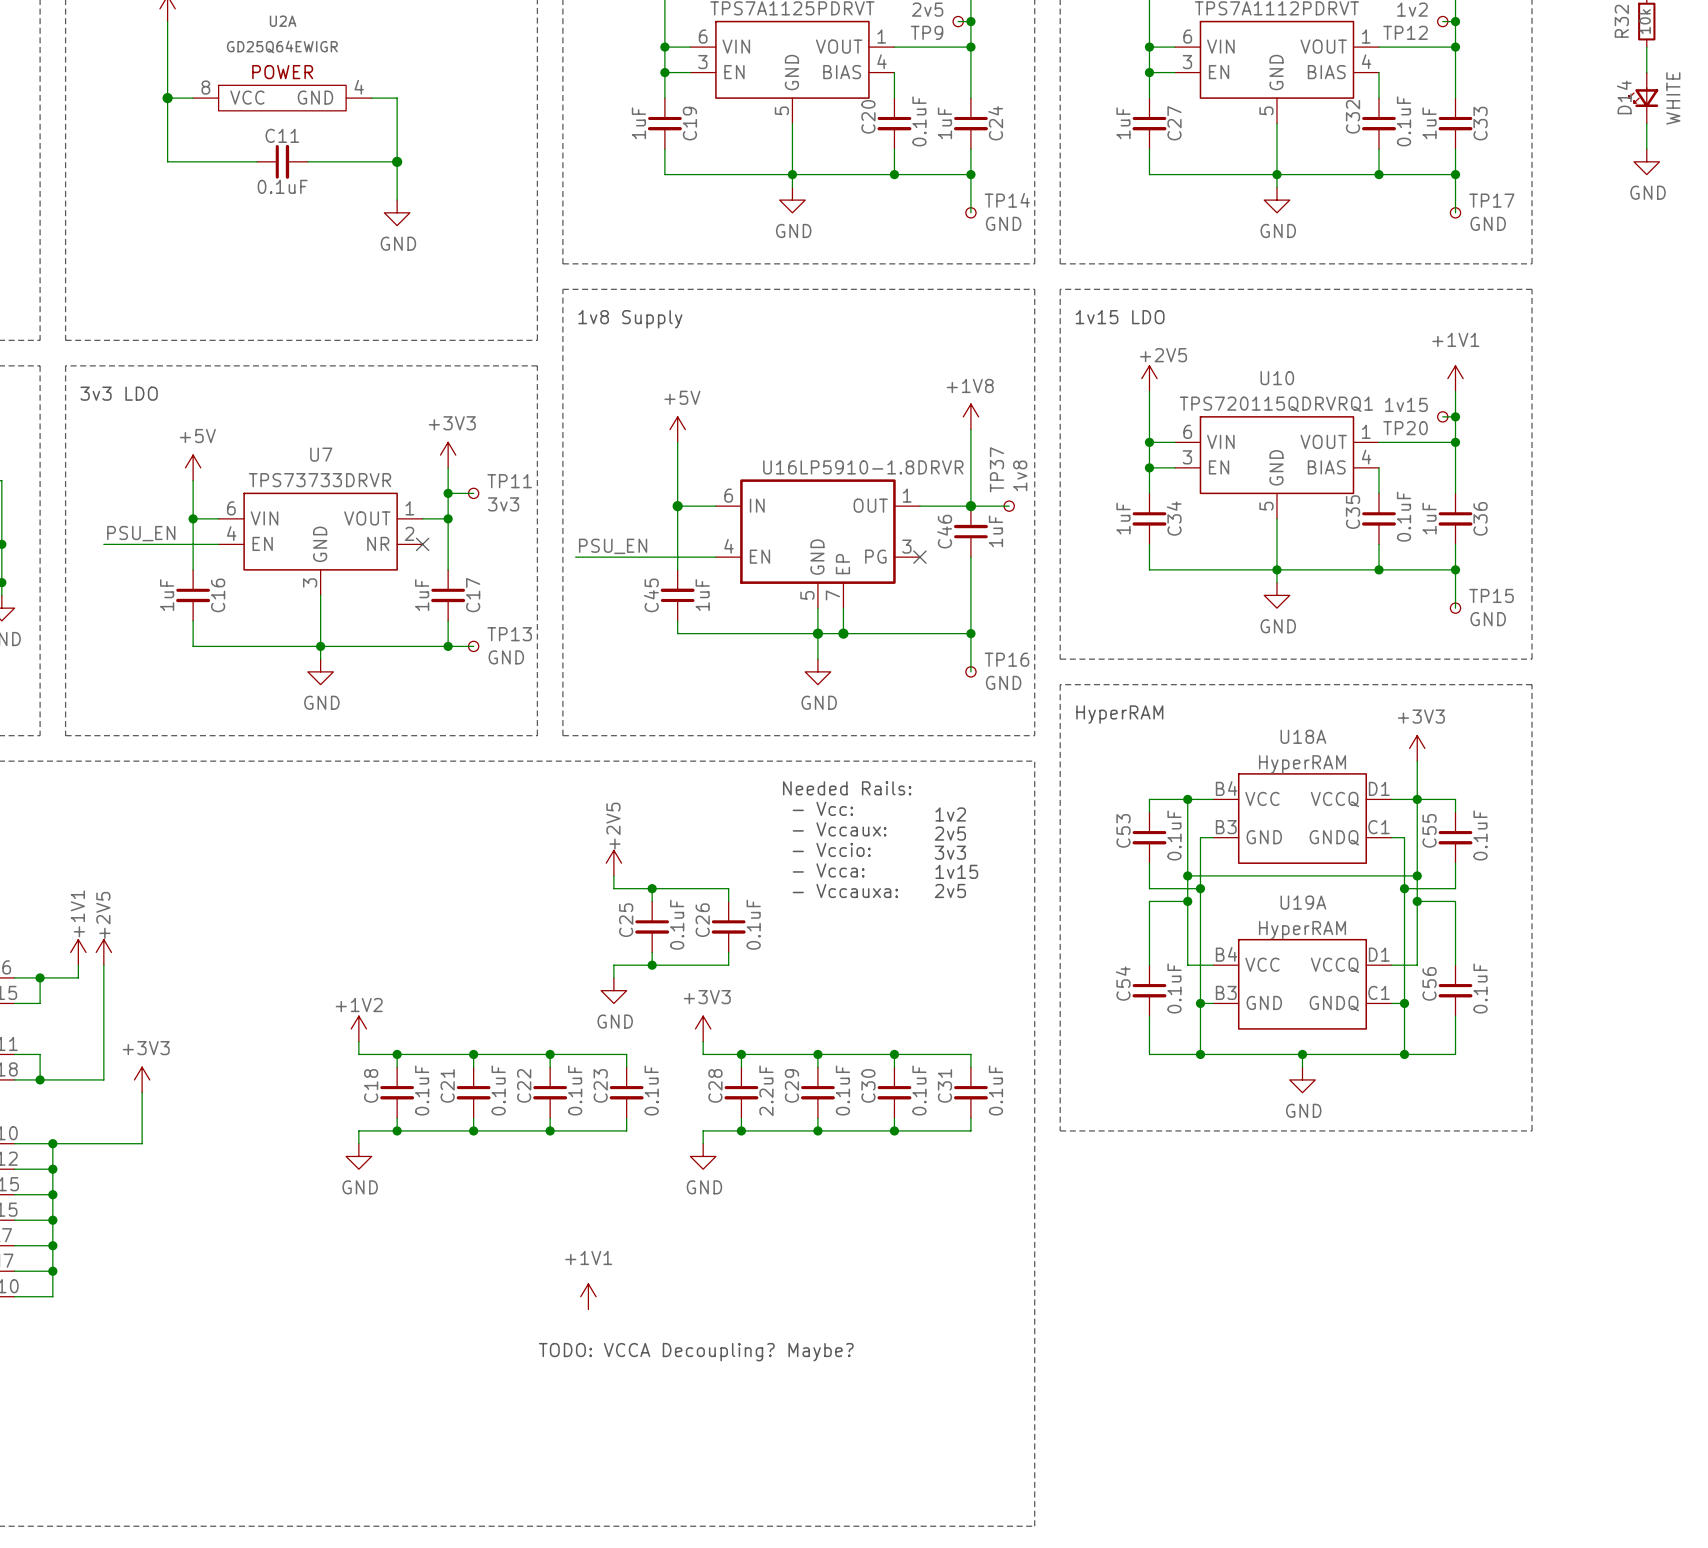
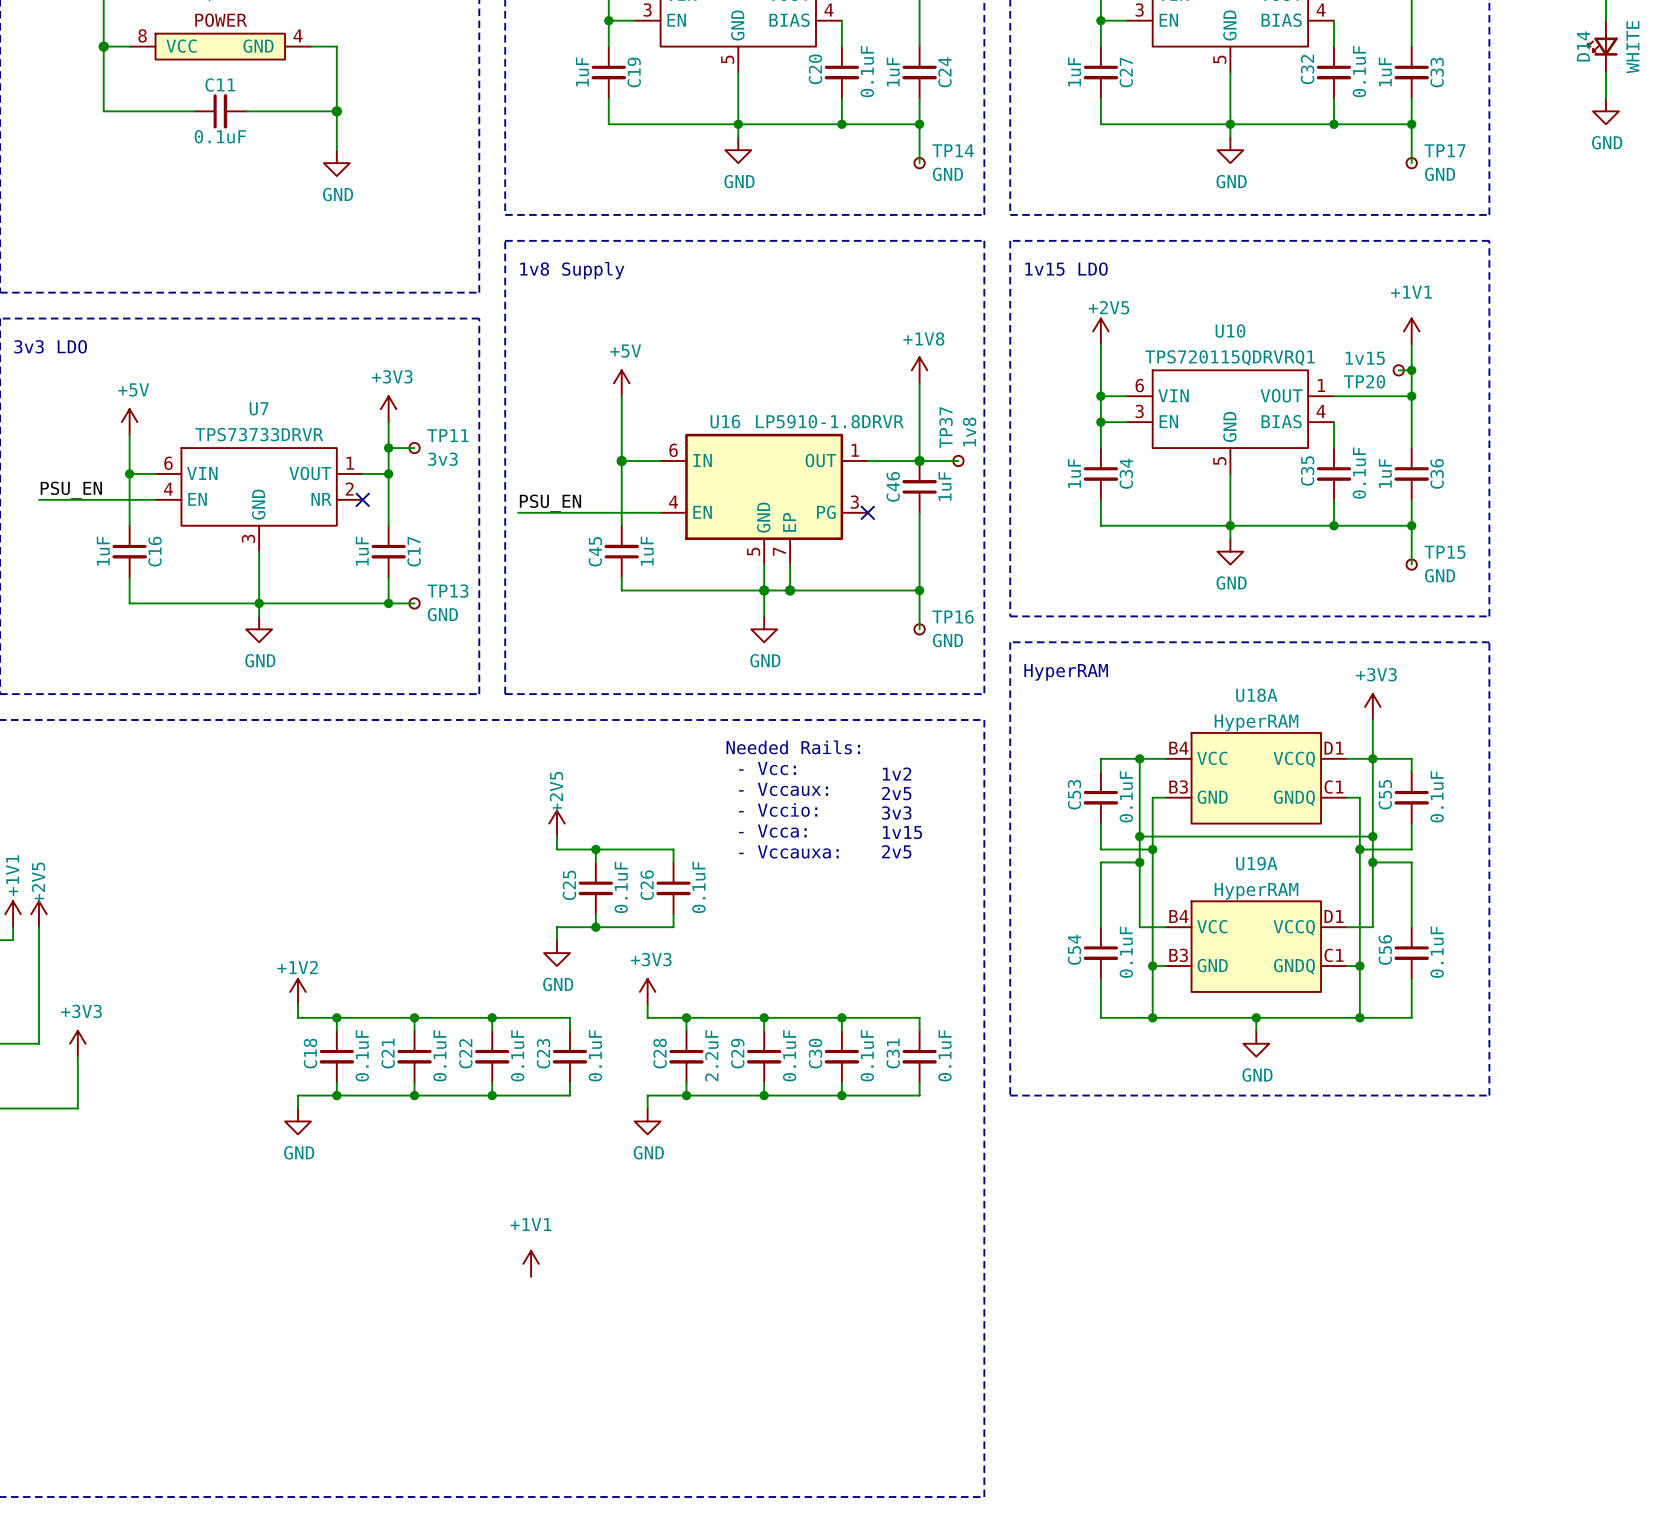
text: TODO: VCCA Decoupling? Maybe? (696, 1352) -> none

